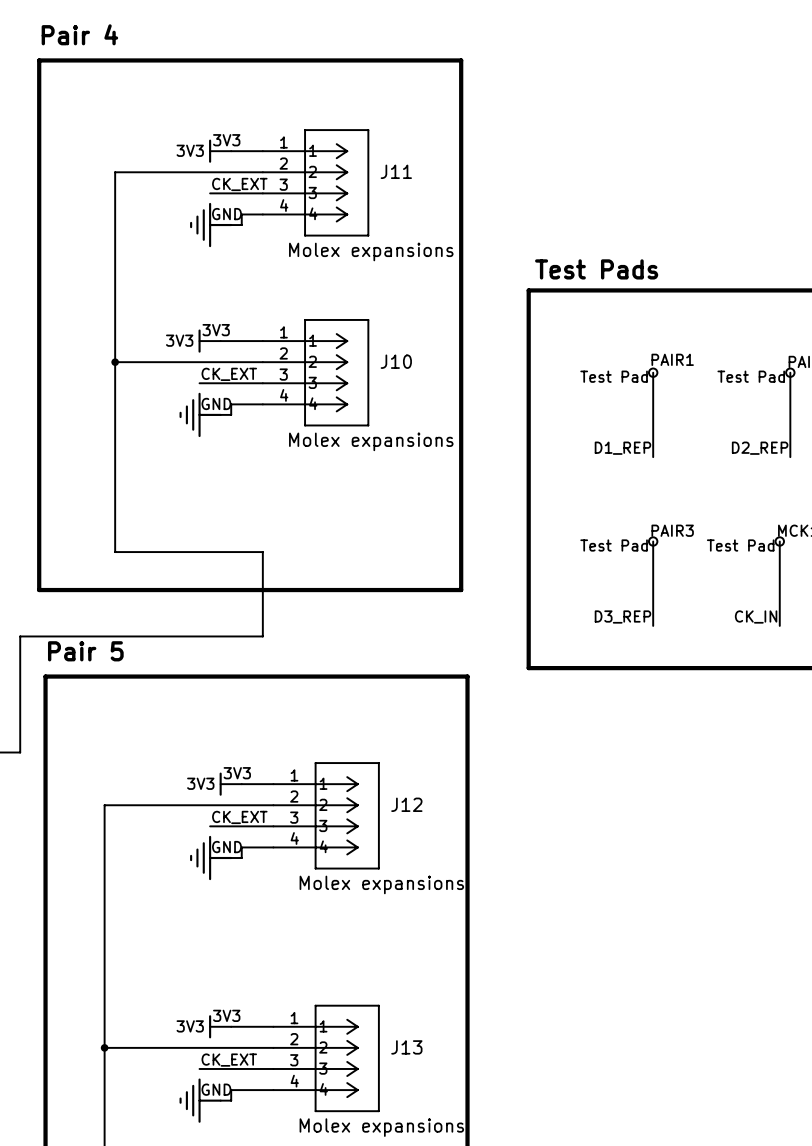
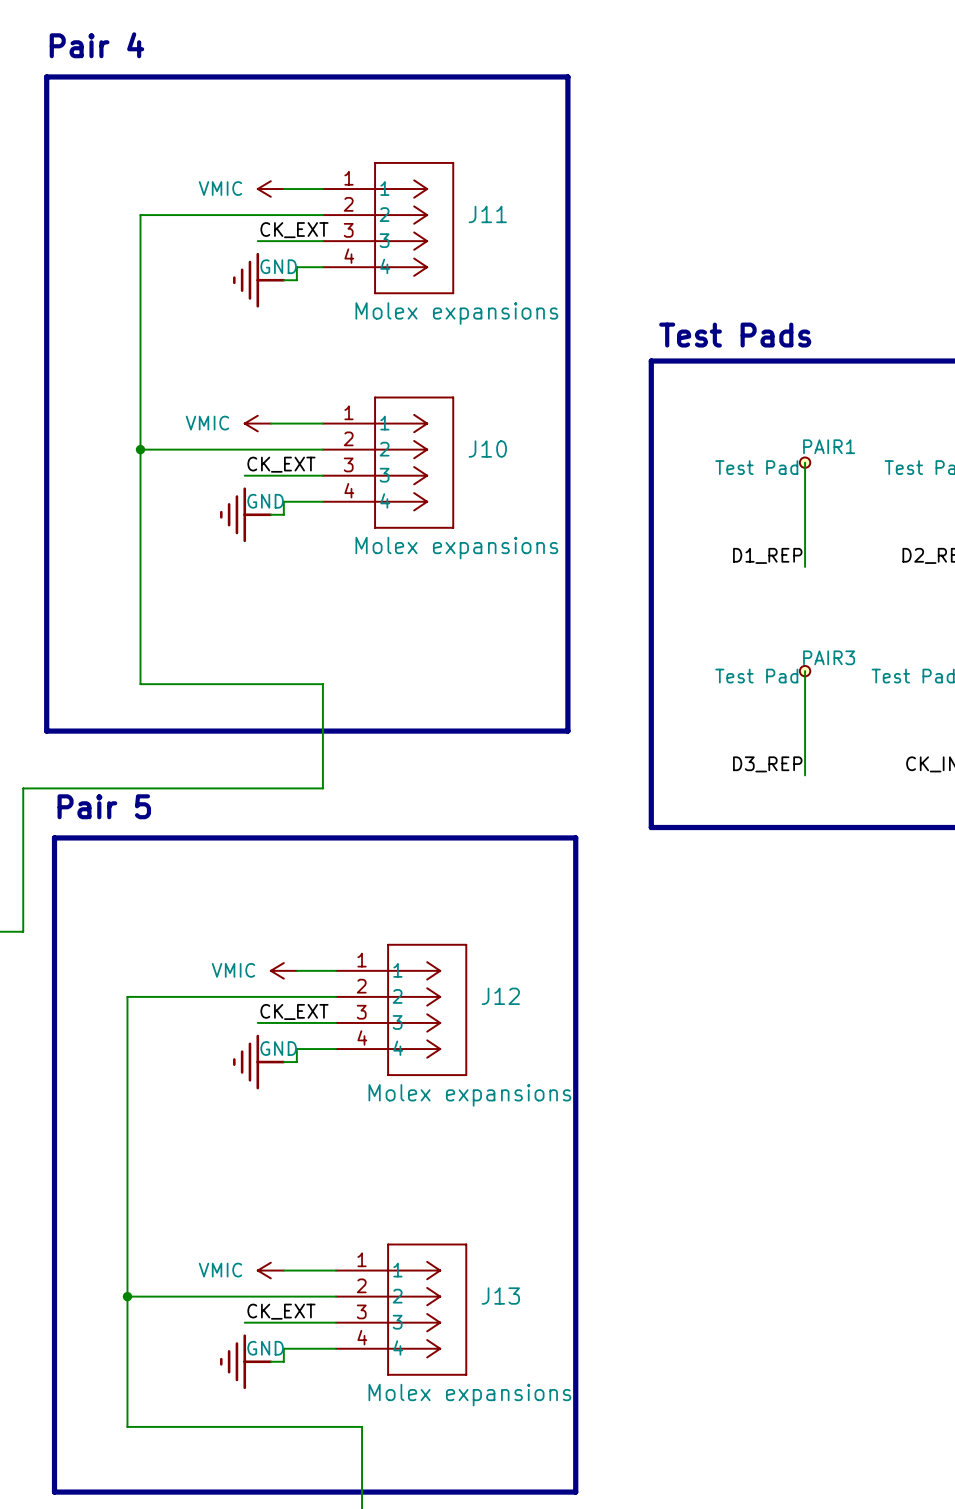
power symbol: 3V3 (220, 151) -> VMIC (270, 189)
power symbol: 3V3 (209, 341) -> VMIC (257, 423)
power symbol: 3V3 (230, 784) -> VMIC (283, 970)
power symbol: 3V3 (220, 1026) -> VMIC (270, 1270)

